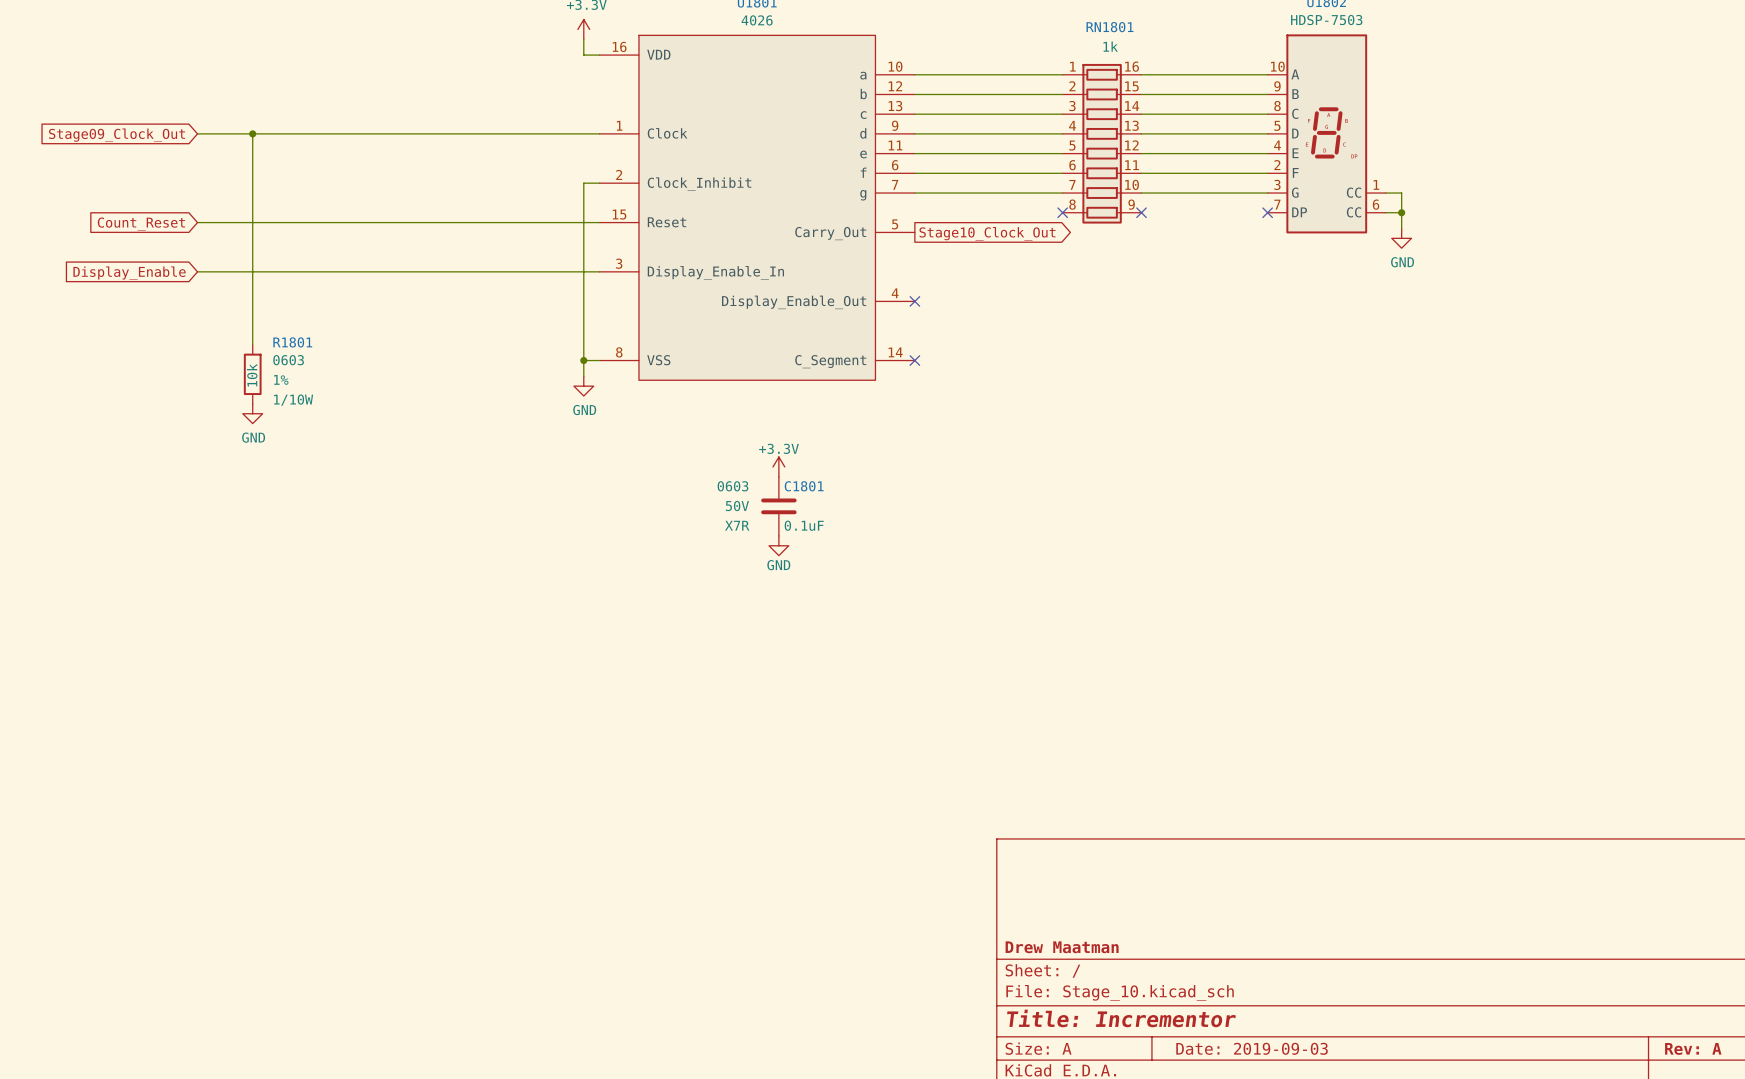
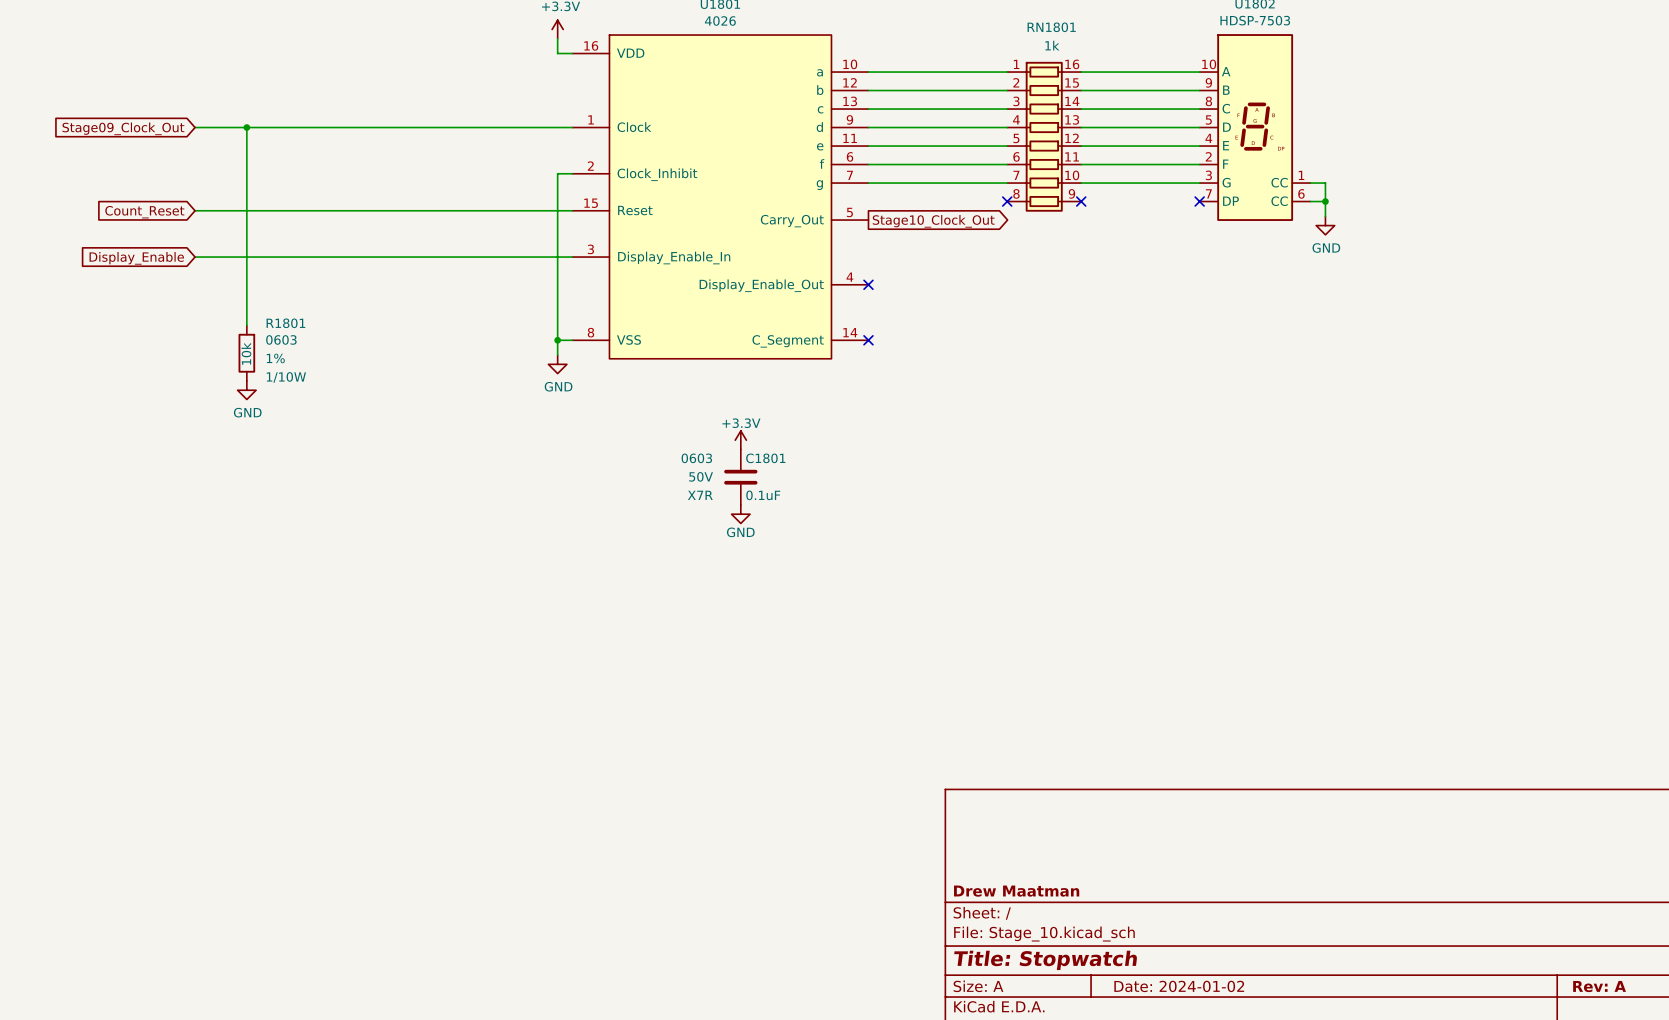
title block: Title: Incrementor (1121, 1018) -> Title: Stopwatch (1045, 960)
title block: Date: 2019-09-03 (1252, 1048) -> Date: 2024-01-02 (1179, 986)

